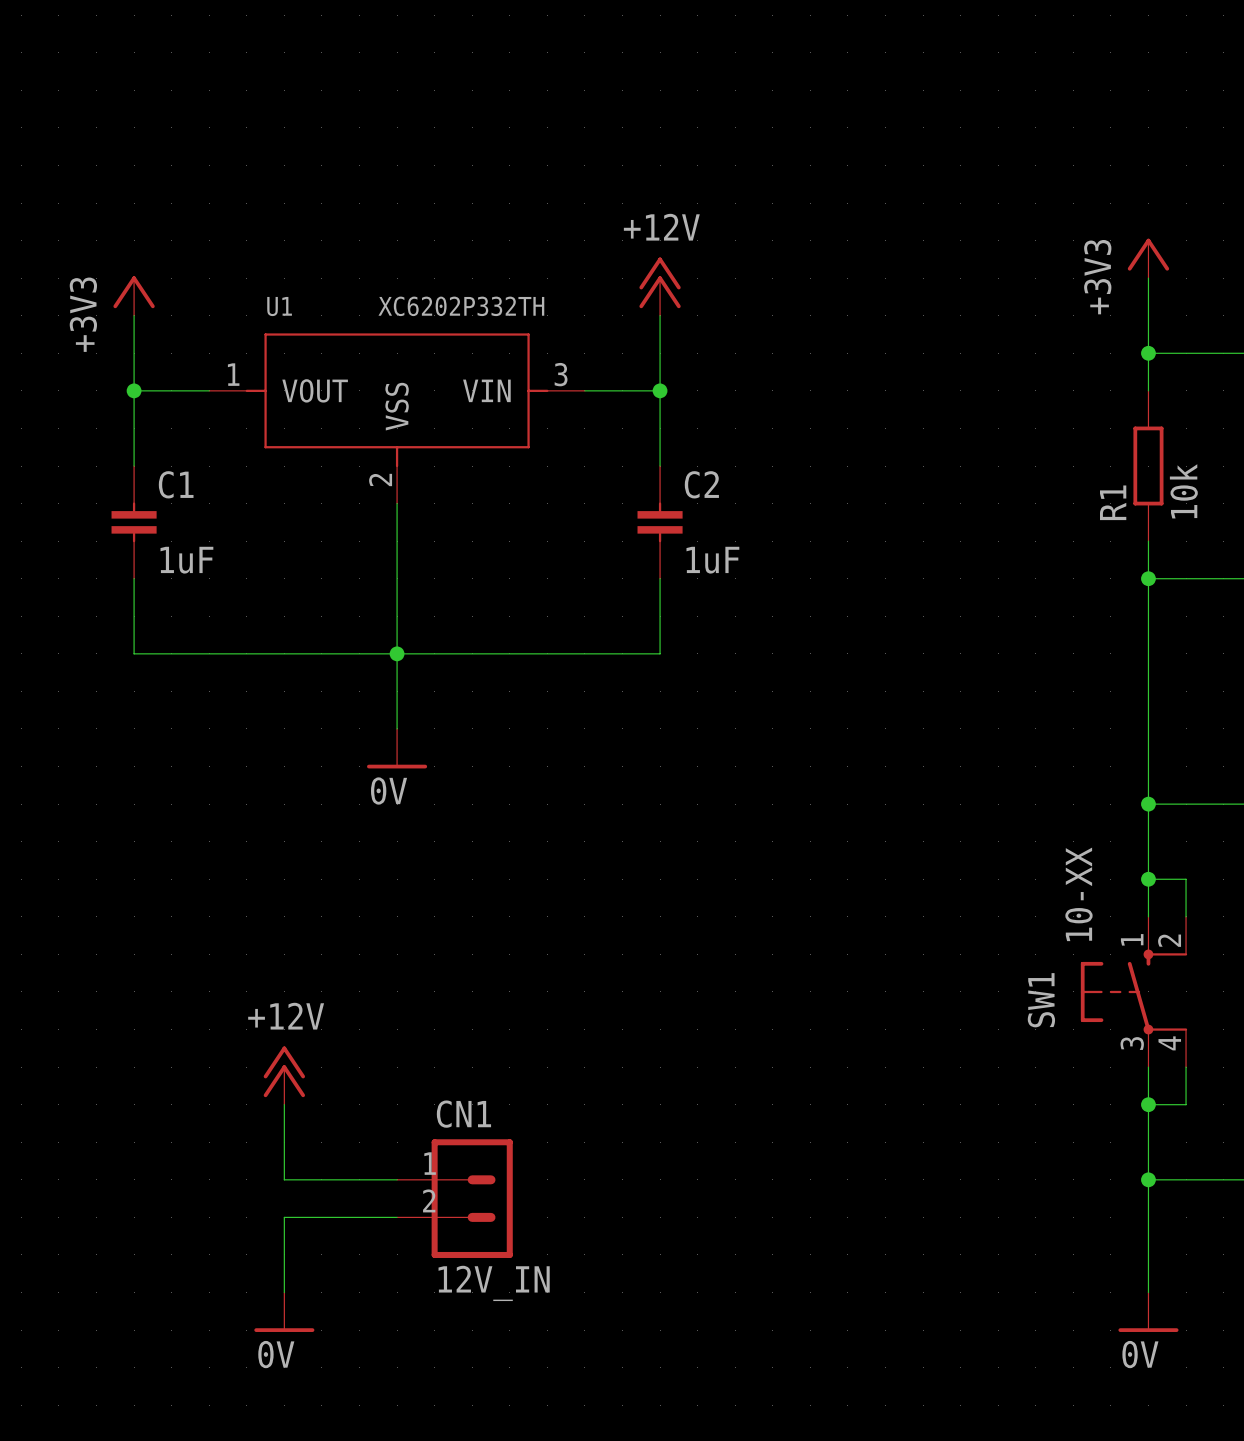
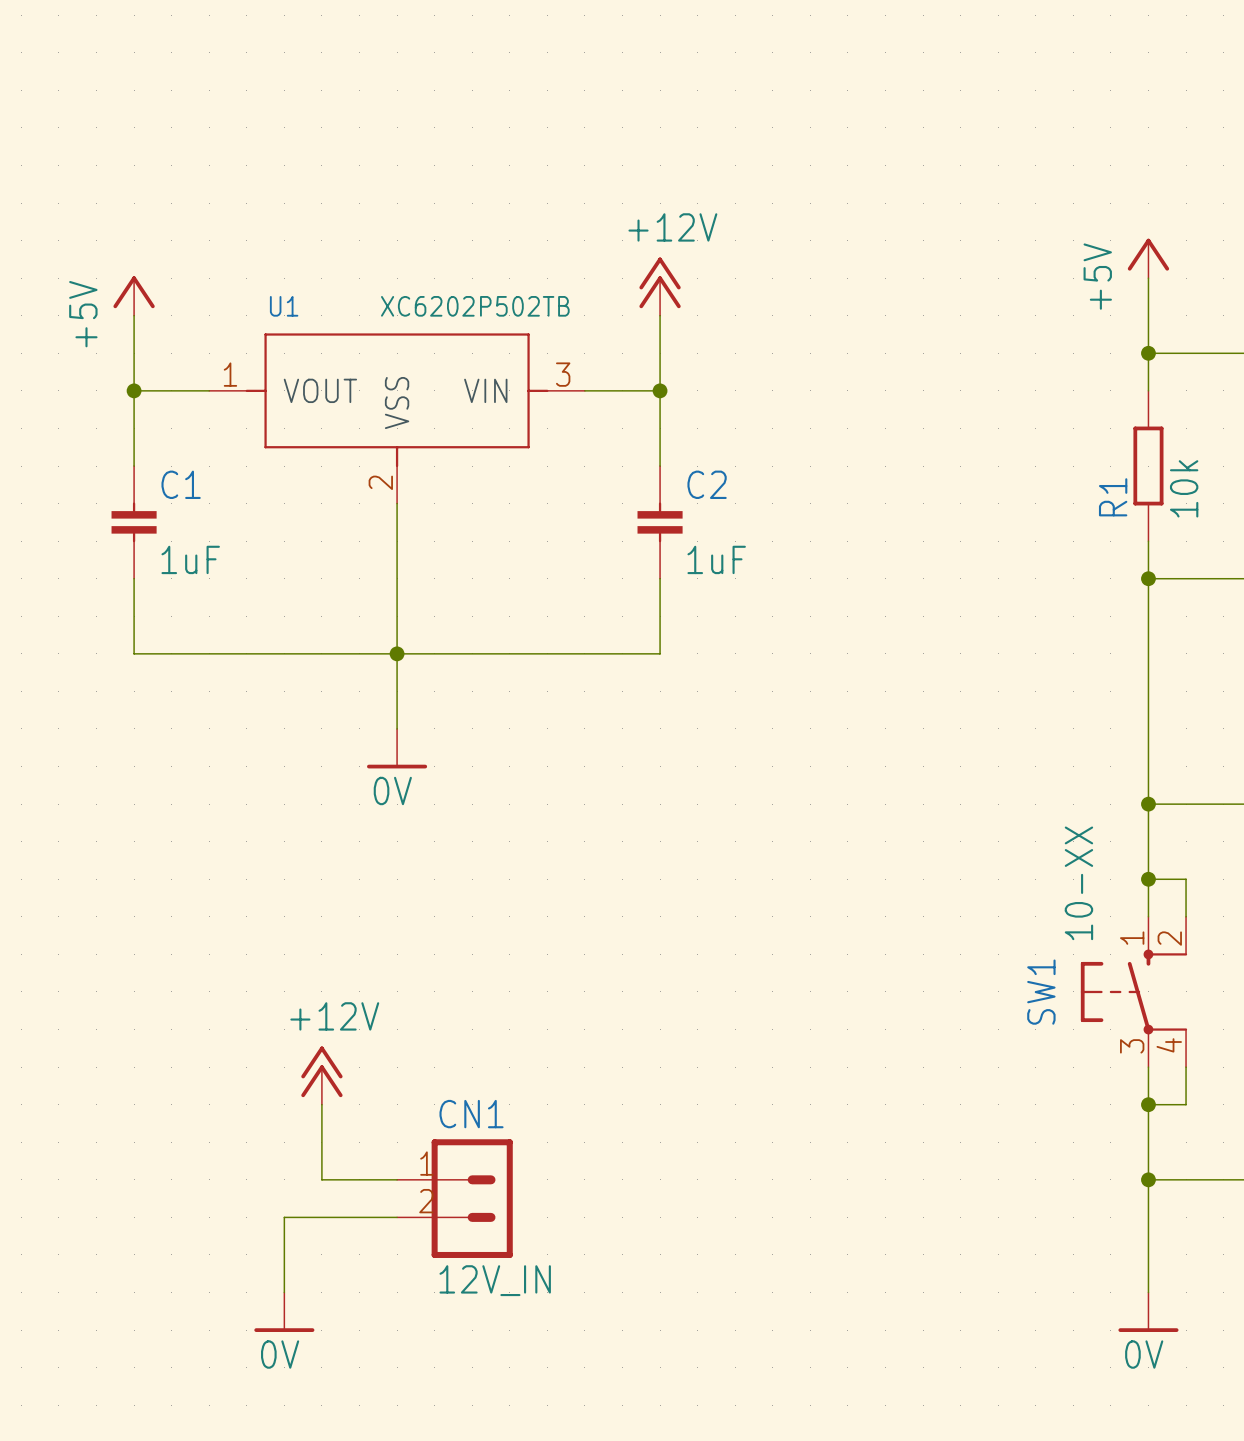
power symbol: +3V3 (1148, 258) -> +5V (1148, 258)
power symbol: +3V3 (134, 296) -> +5V (134, 296)
U1 value: XC6202P332TH (461, 306) -> XC6202P502TB (475, 306)
power symbol position: +12V (284, 1075) -> +12V (321, 1075)
wire: (284, 1104) (284, 1179) (321, 1179) -> (321, 1104) (321, 1179)

